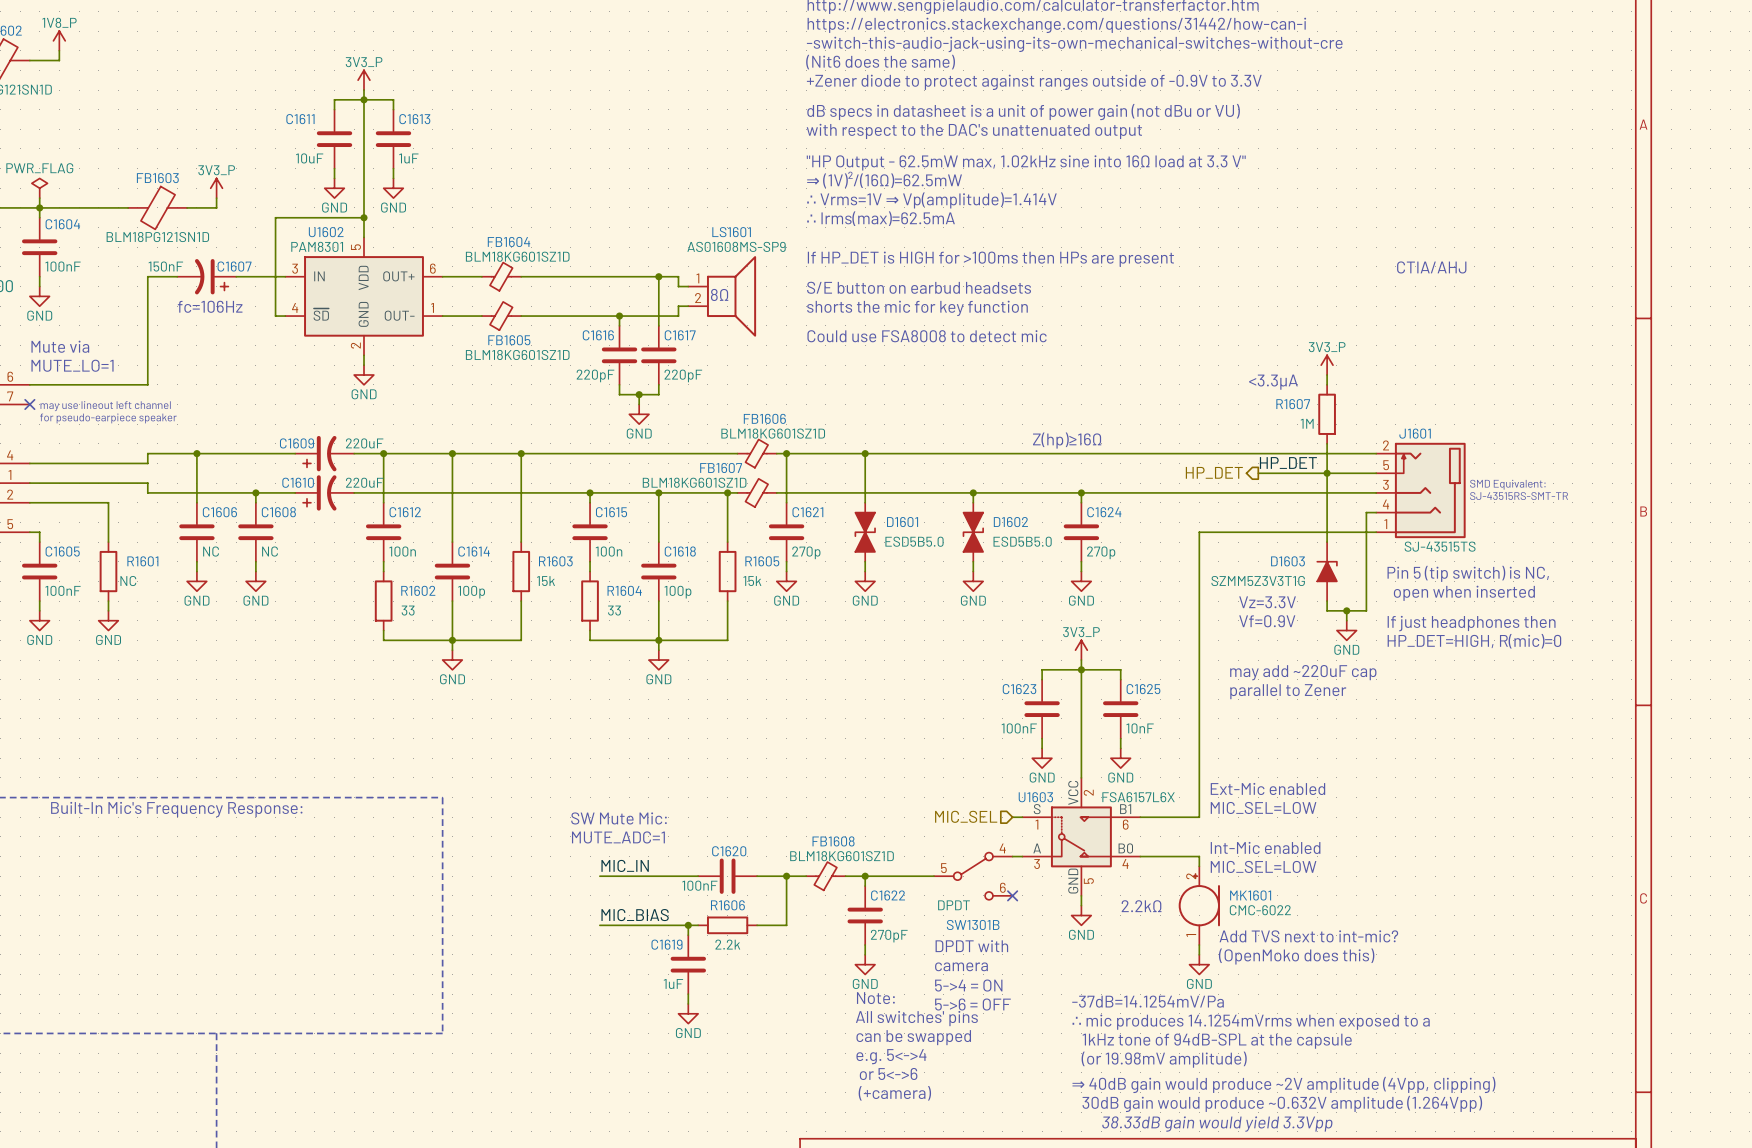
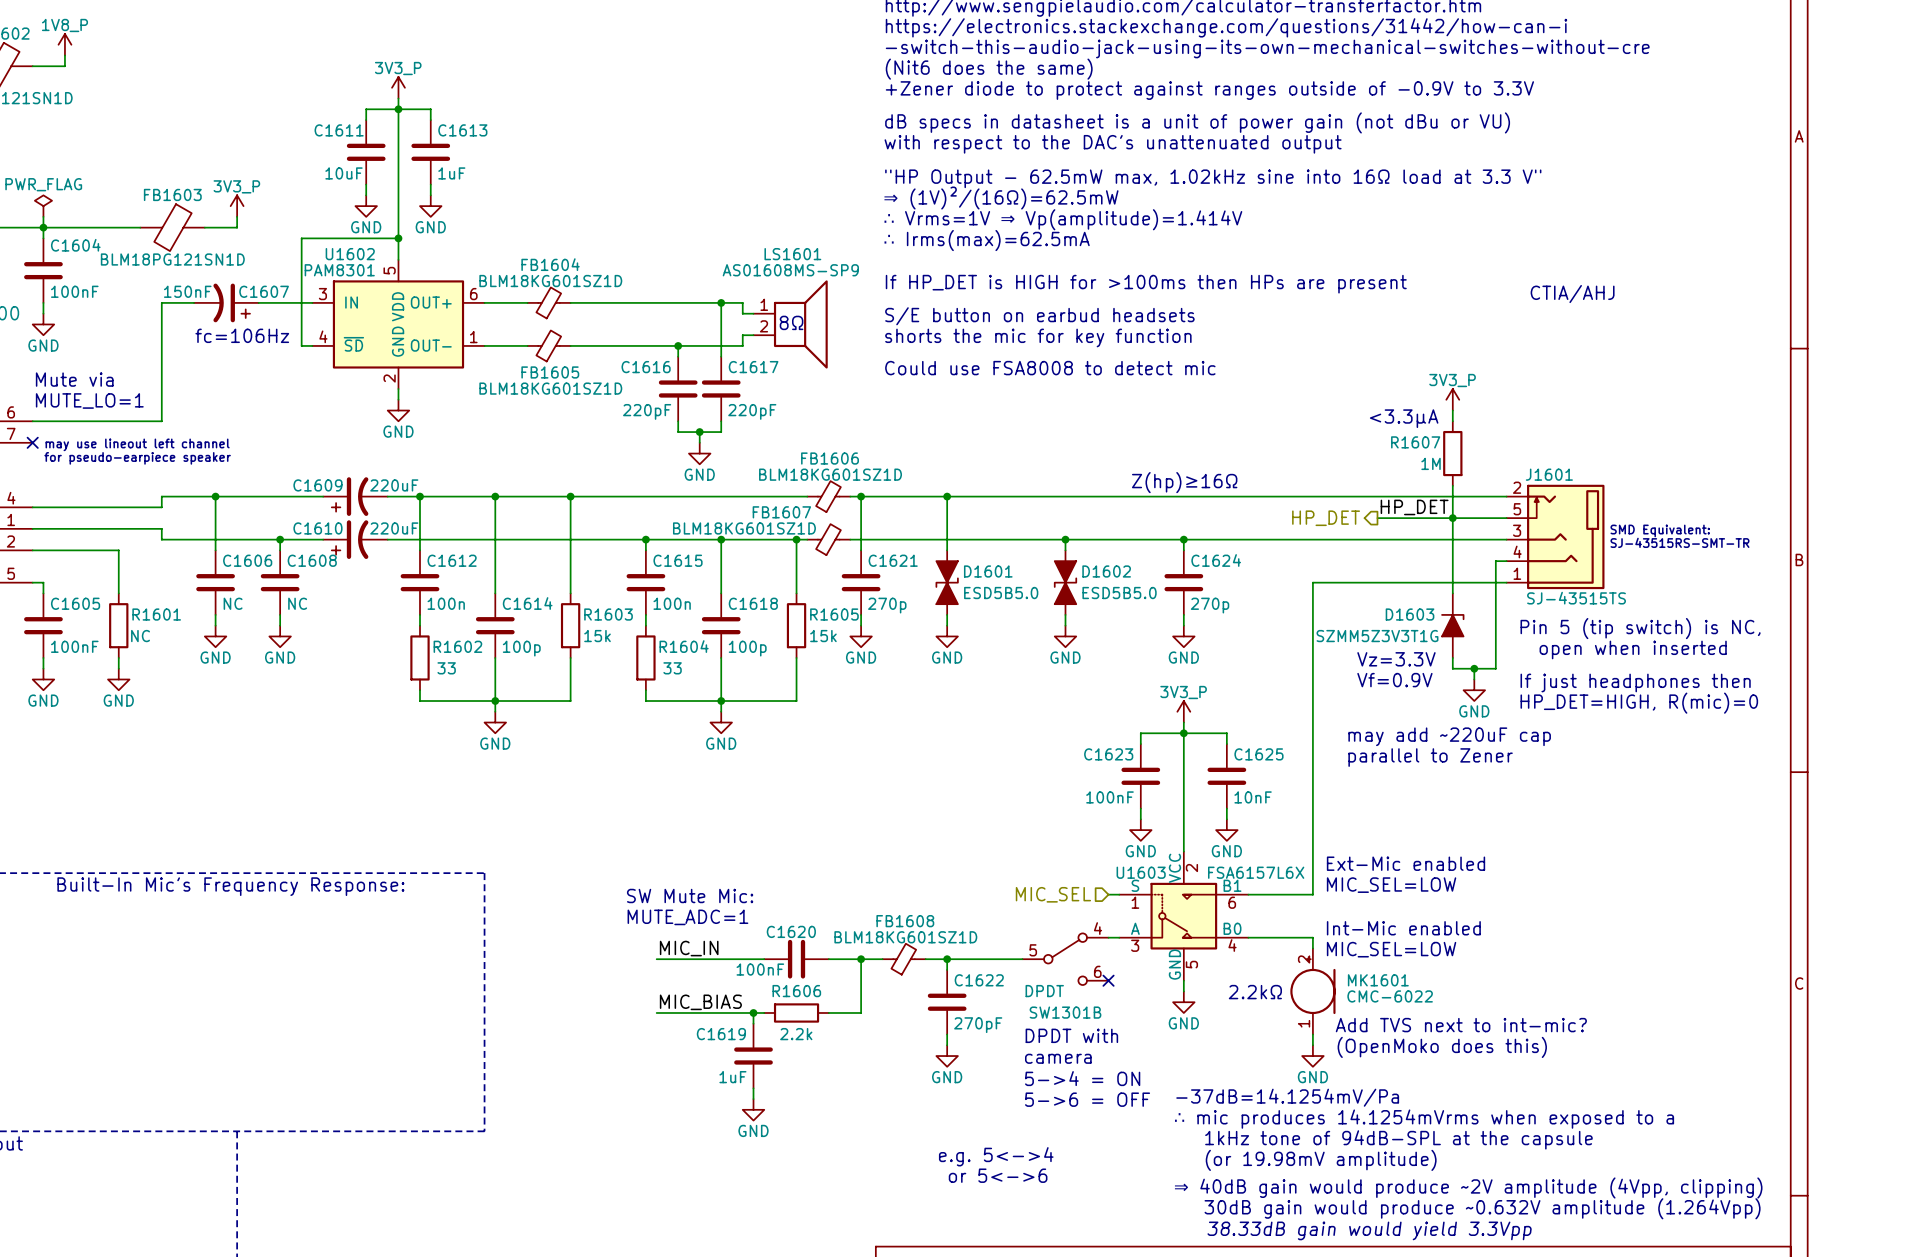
text: Note: (875, 998) -> none
text: All switches' pins (916, 1018) -> none
text: can be swapped (913, 1037) -> none
text: (+camera) (894, 1093) -> none

